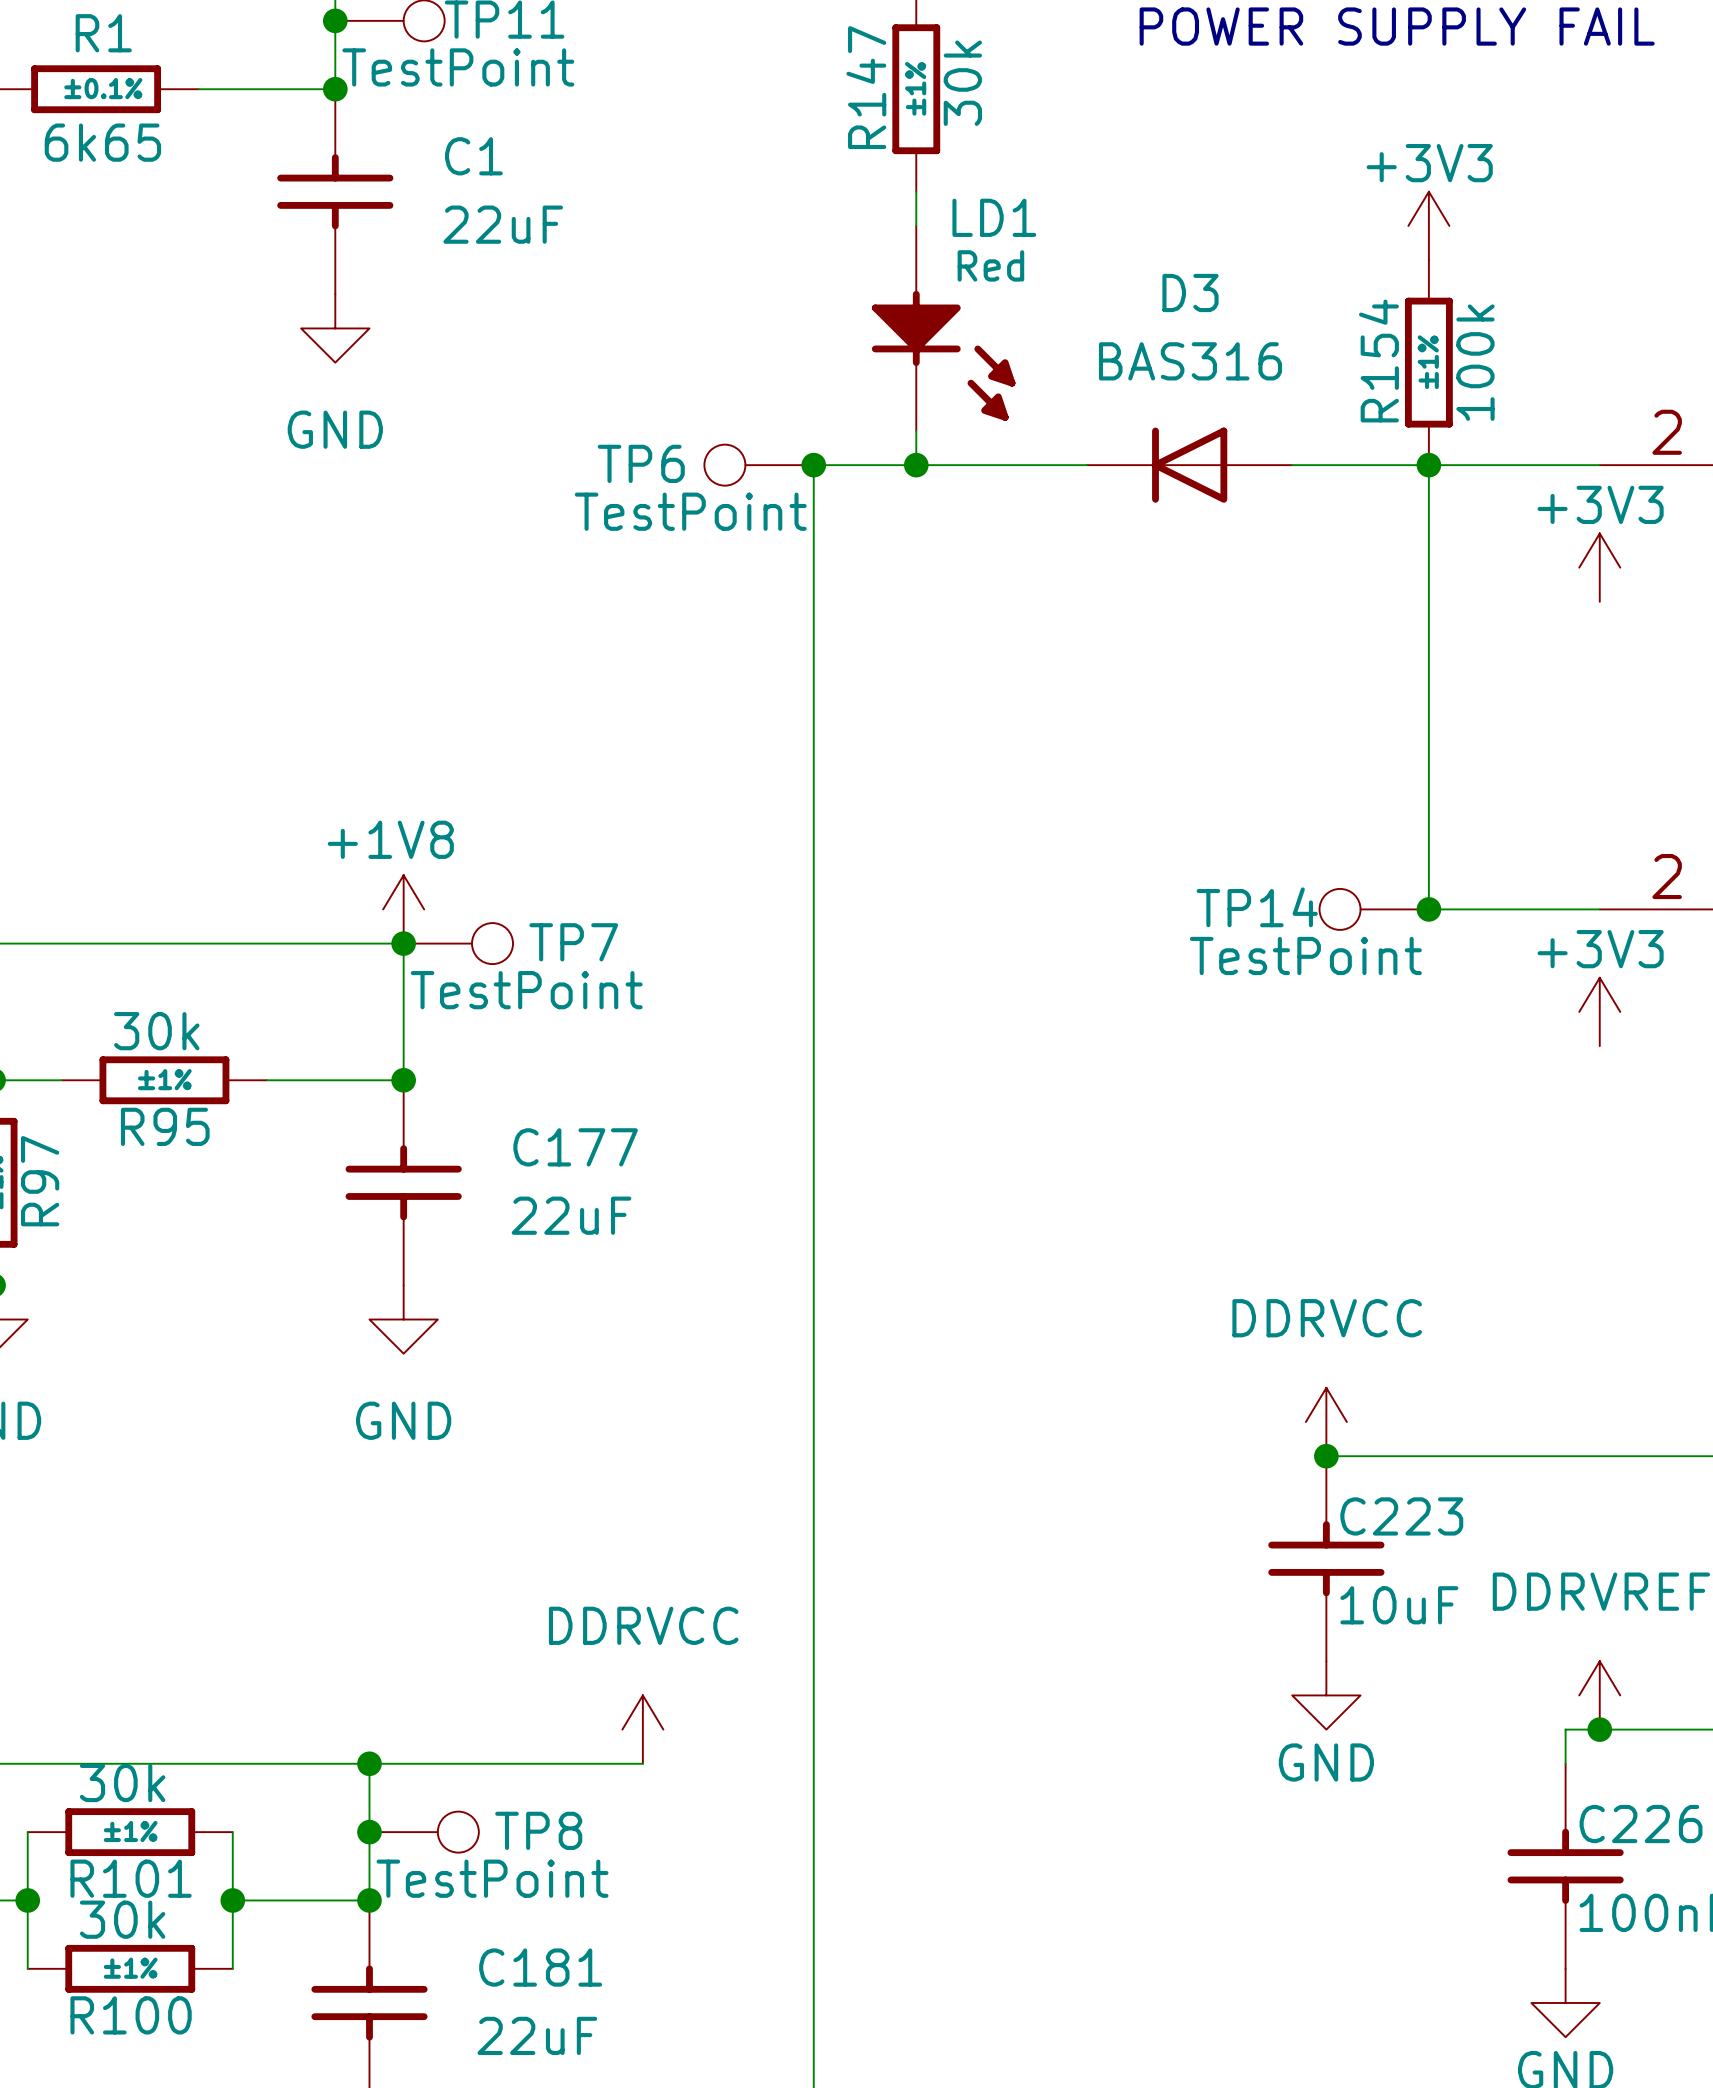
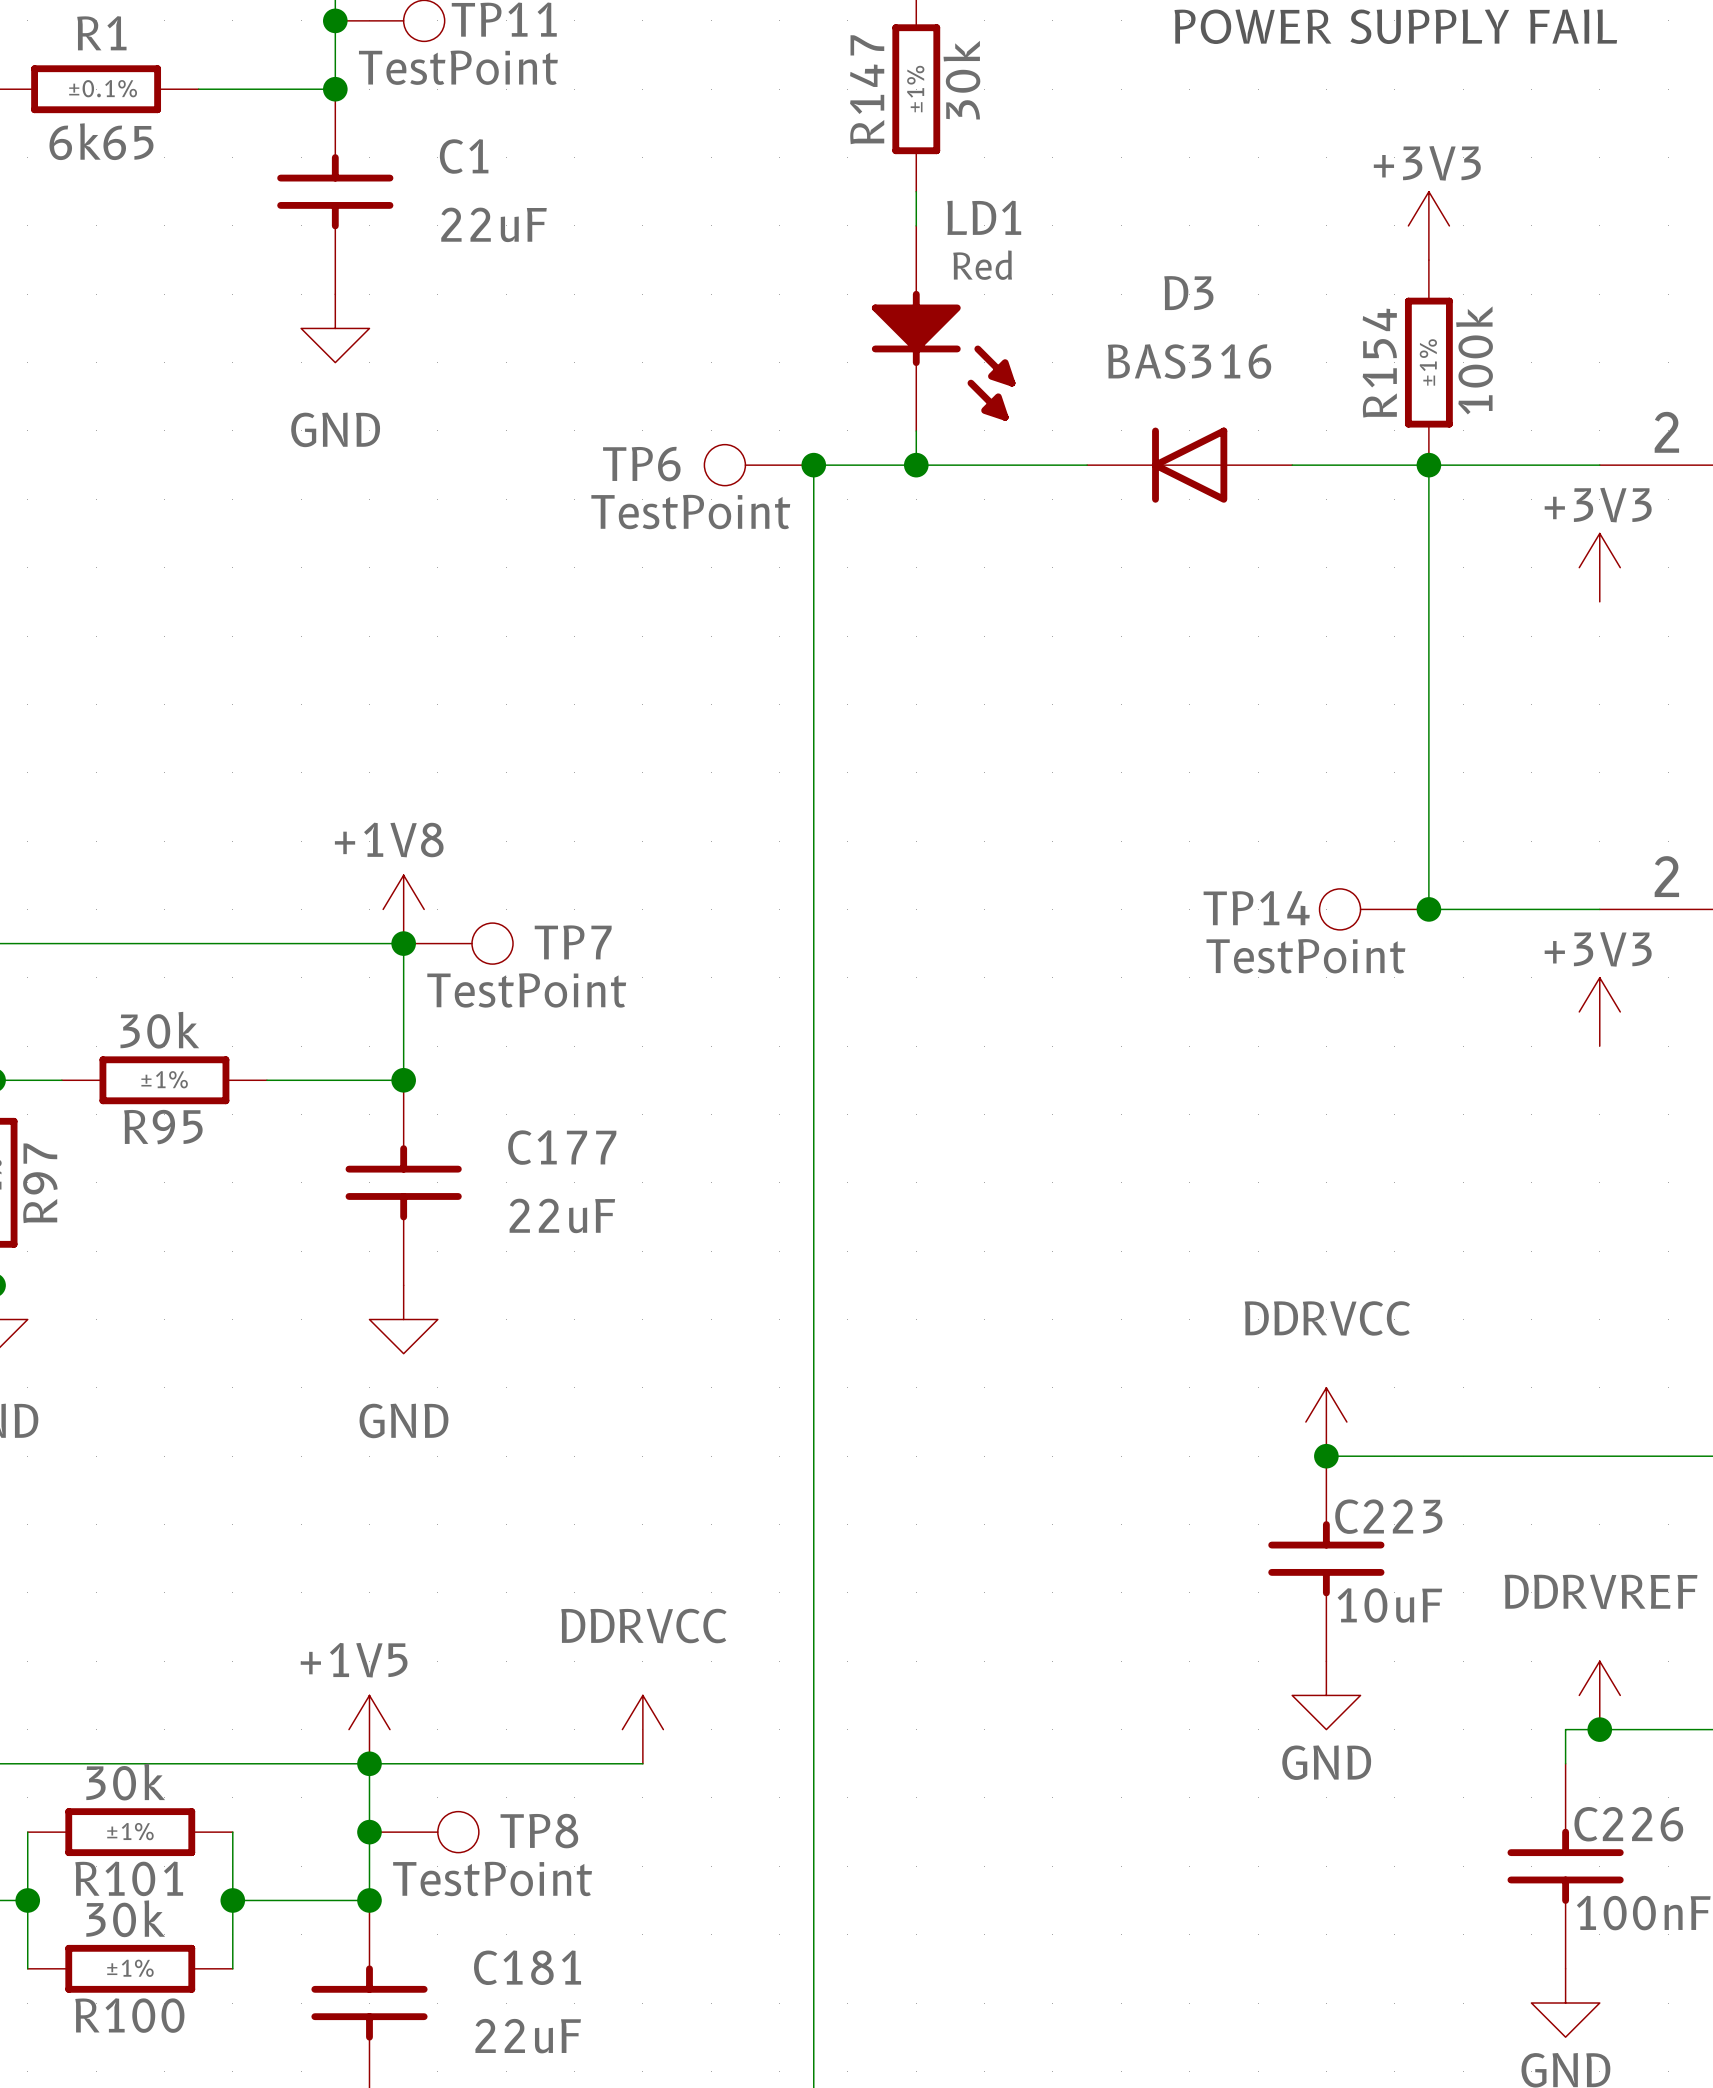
power symbol: none -> +1V5 (369, 1729)

